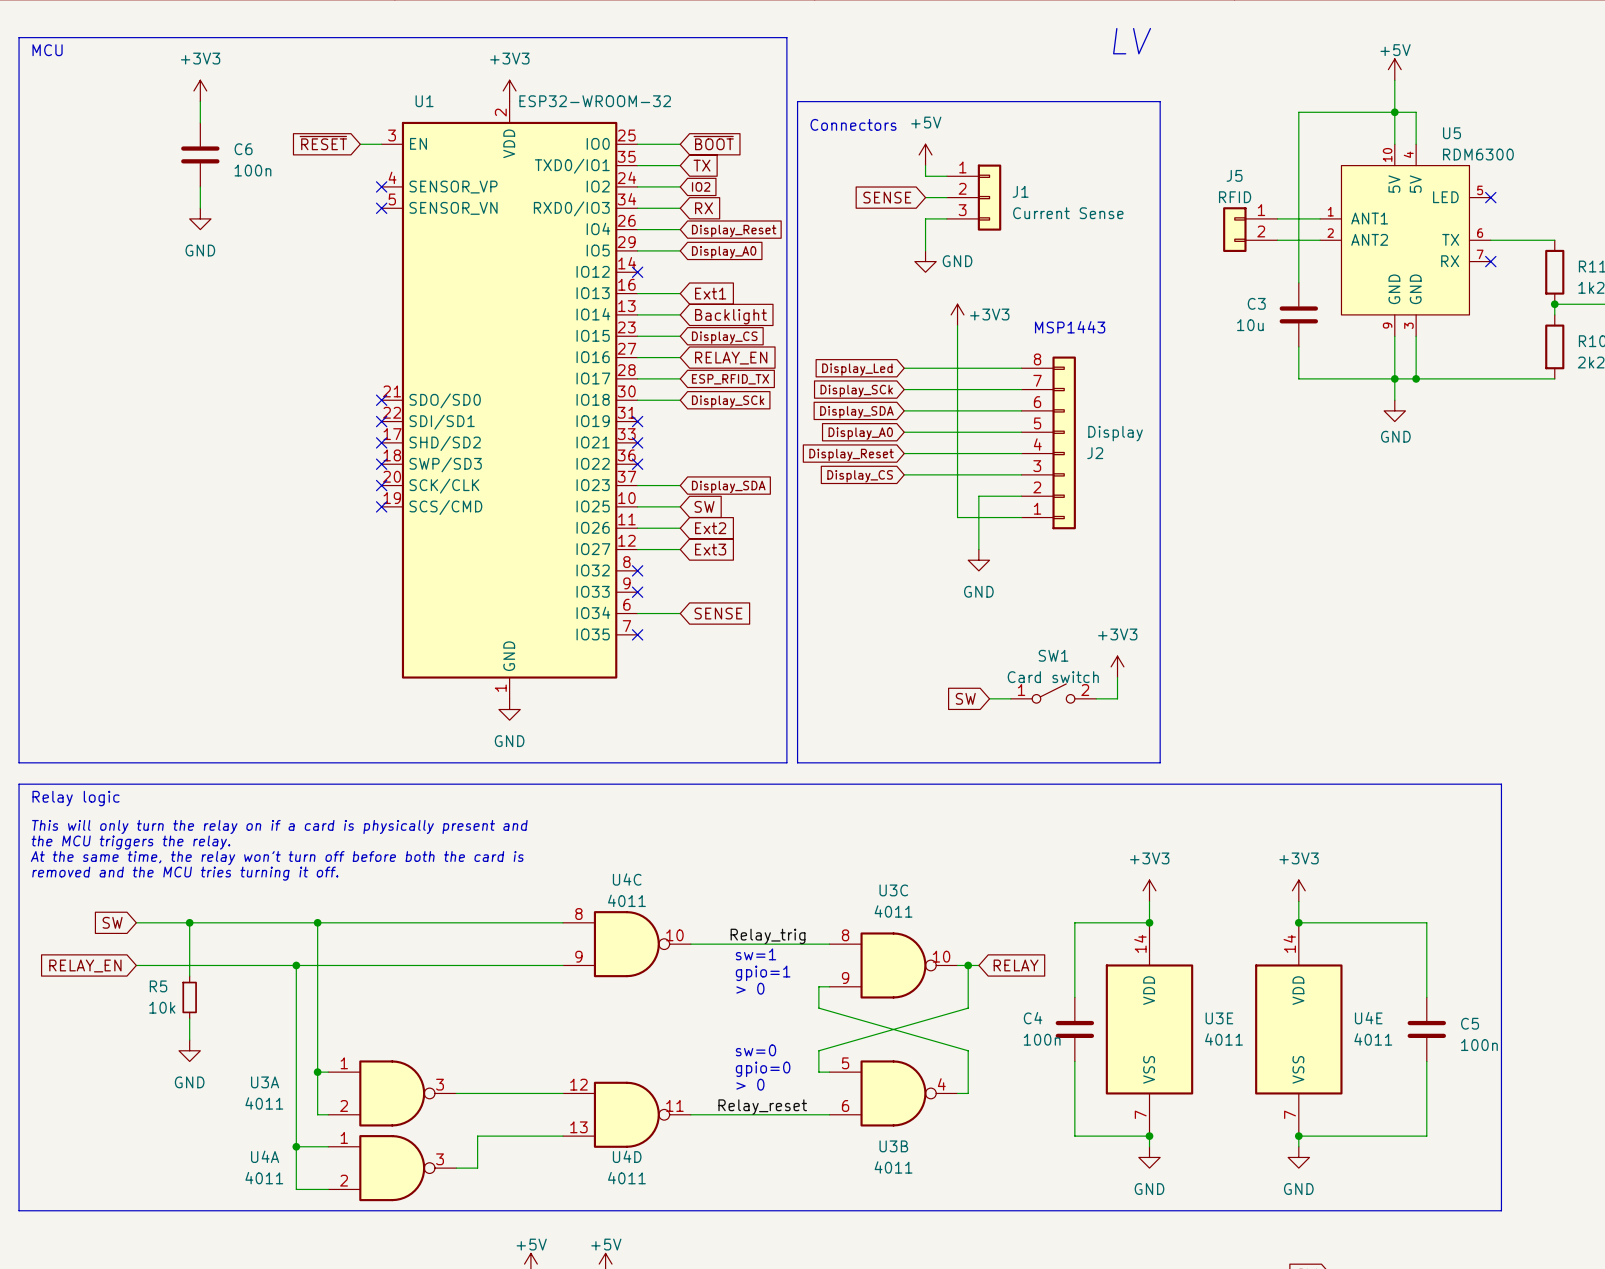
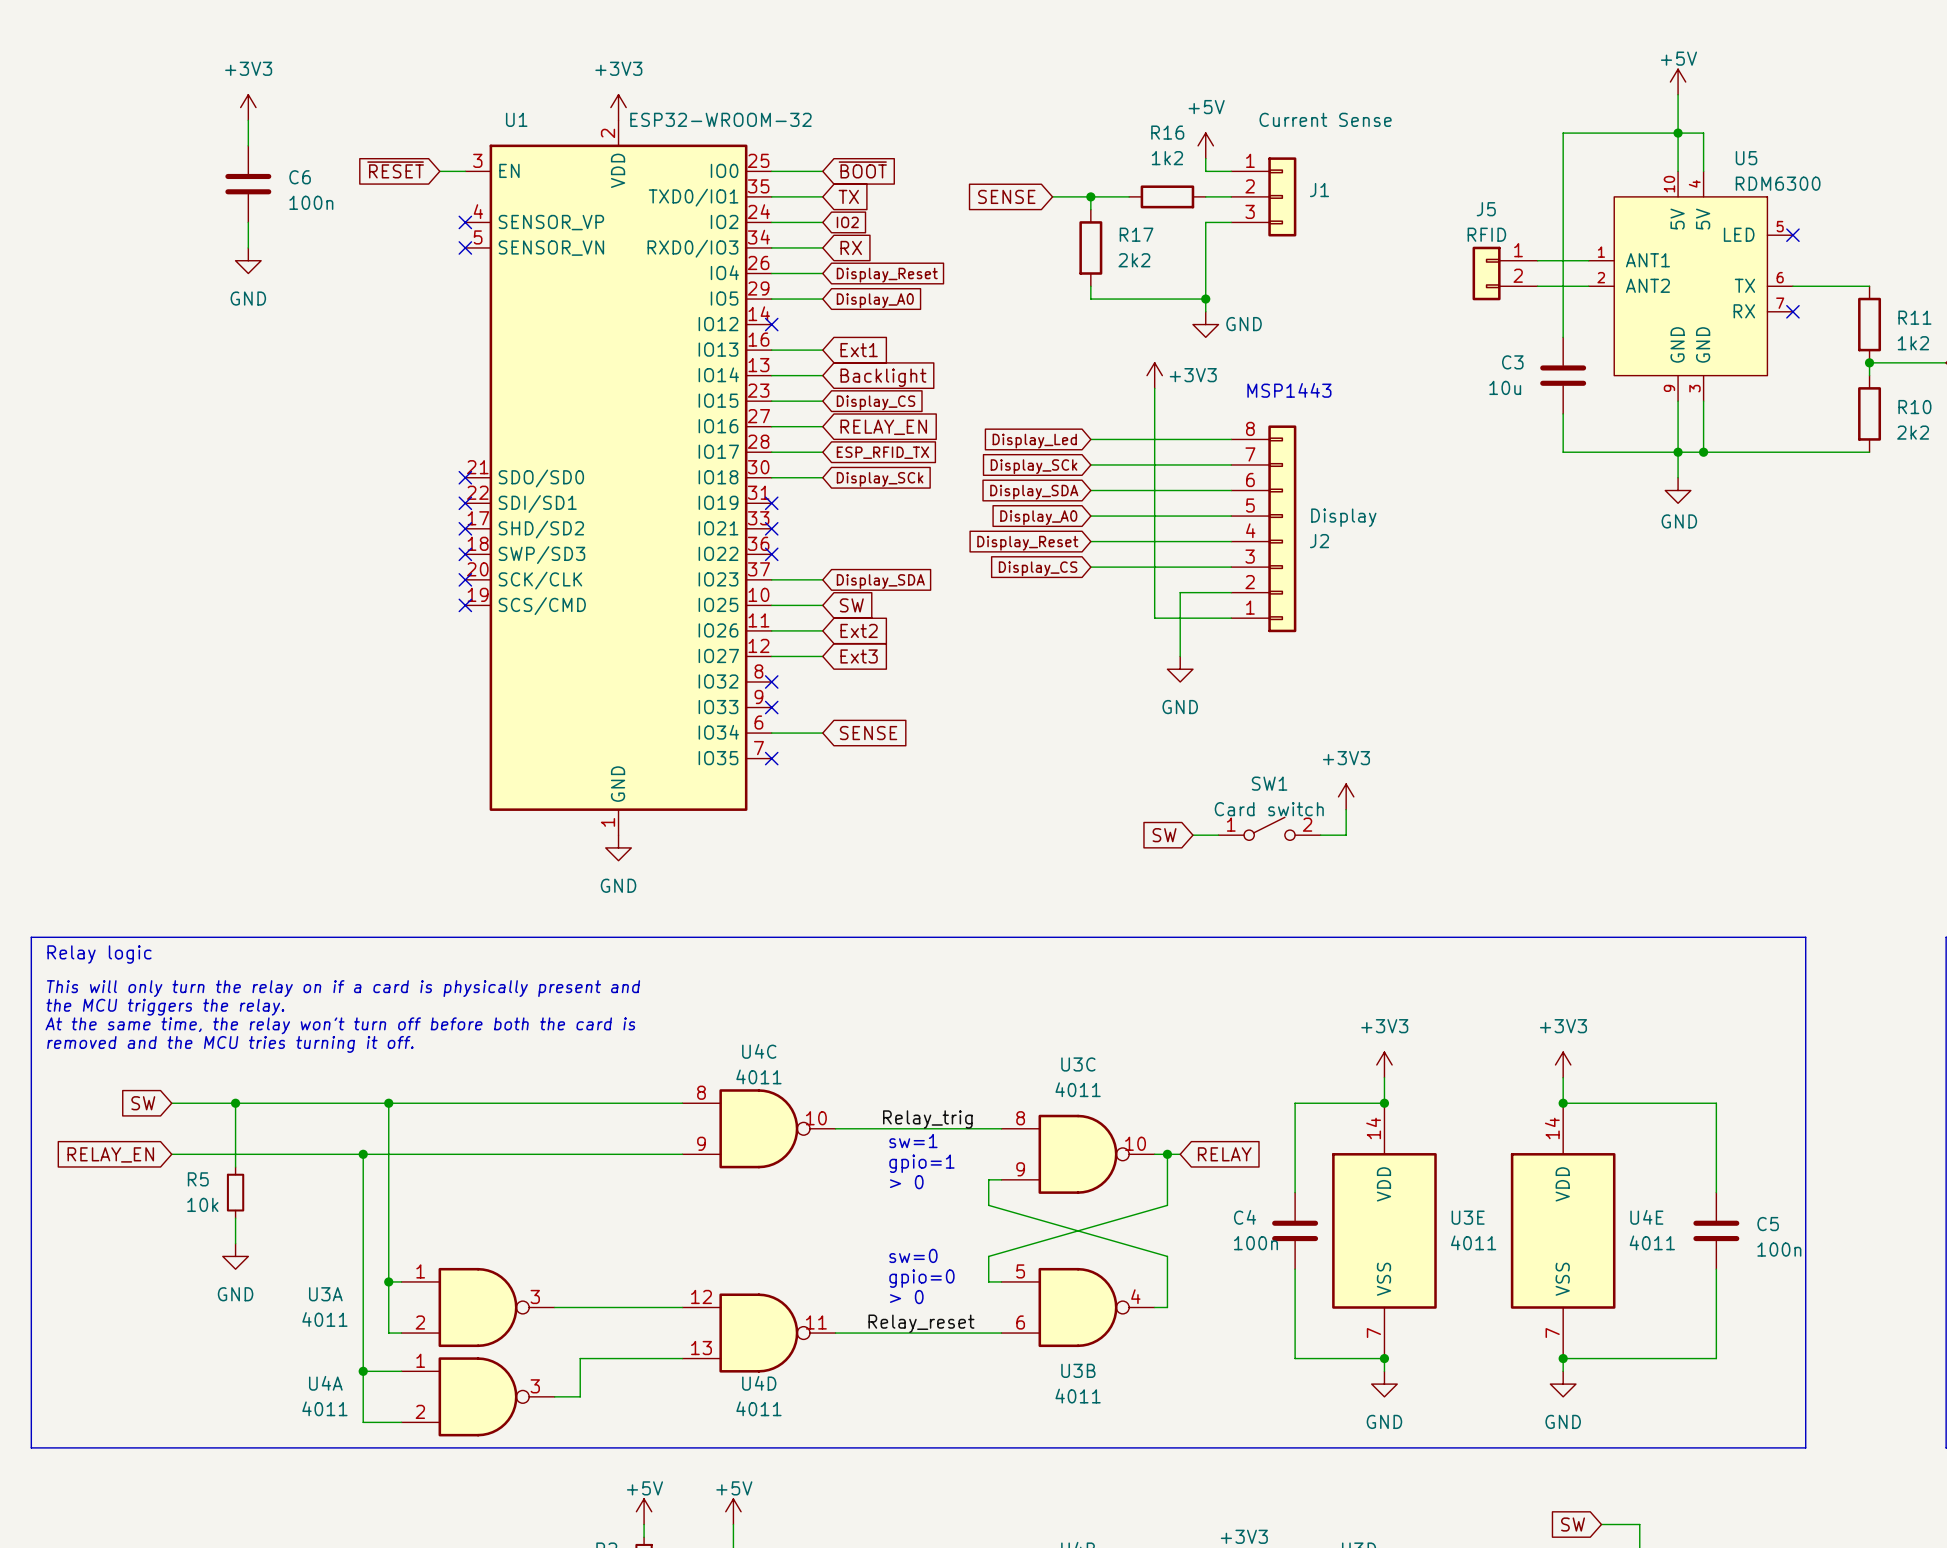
line: (19, 37) (19, 762) (786, 762) (786, 37) (19, 37) -> none
text: LV (1132, 41) -> none
text: MCU (47, 50) -> none
line: (797, 101) (1160, 101) (1160, 762) (797, 762) (797, 101) -> none
text: Connectors (853, 124) -> none
power symbol position: +5V (925, 154) -> +5V (1205, 145)
wire: none -> (1052, 196) (1129, 196)
wire: none -> (1090, 196) (1090, 209)
junction: none -> (1090, 196)
wire: (925, 165) (925, 176) (946, 176) -> (1205, 158) (1205, 171) (1231, 171)
R16: none -> 1k2 (1167, 196)
wire: none -> (1231, 222) (1205, 222) (1205, 311)
global label position: SENSE (887, 197) -> SENSE (1006, 196)
wire: (925, 197) (946, 197) -> (1205, 196) (1231, 196)
J1 position: (974, 197) -> (1263, 196)
R17: none -> 2k2 (1090, 247)
J1 value position: Current Sense (1068, 213) -> Current Sense (1325, 119)
wire: (946, 218) (925, 218) (925, 250) -> none
wire: none -> (1090, 286) (1090, 299) (1205, 299)
junction: none -> (1205, 299)
power symbol position: GND (925, 261) -> GND (1205, 324)

